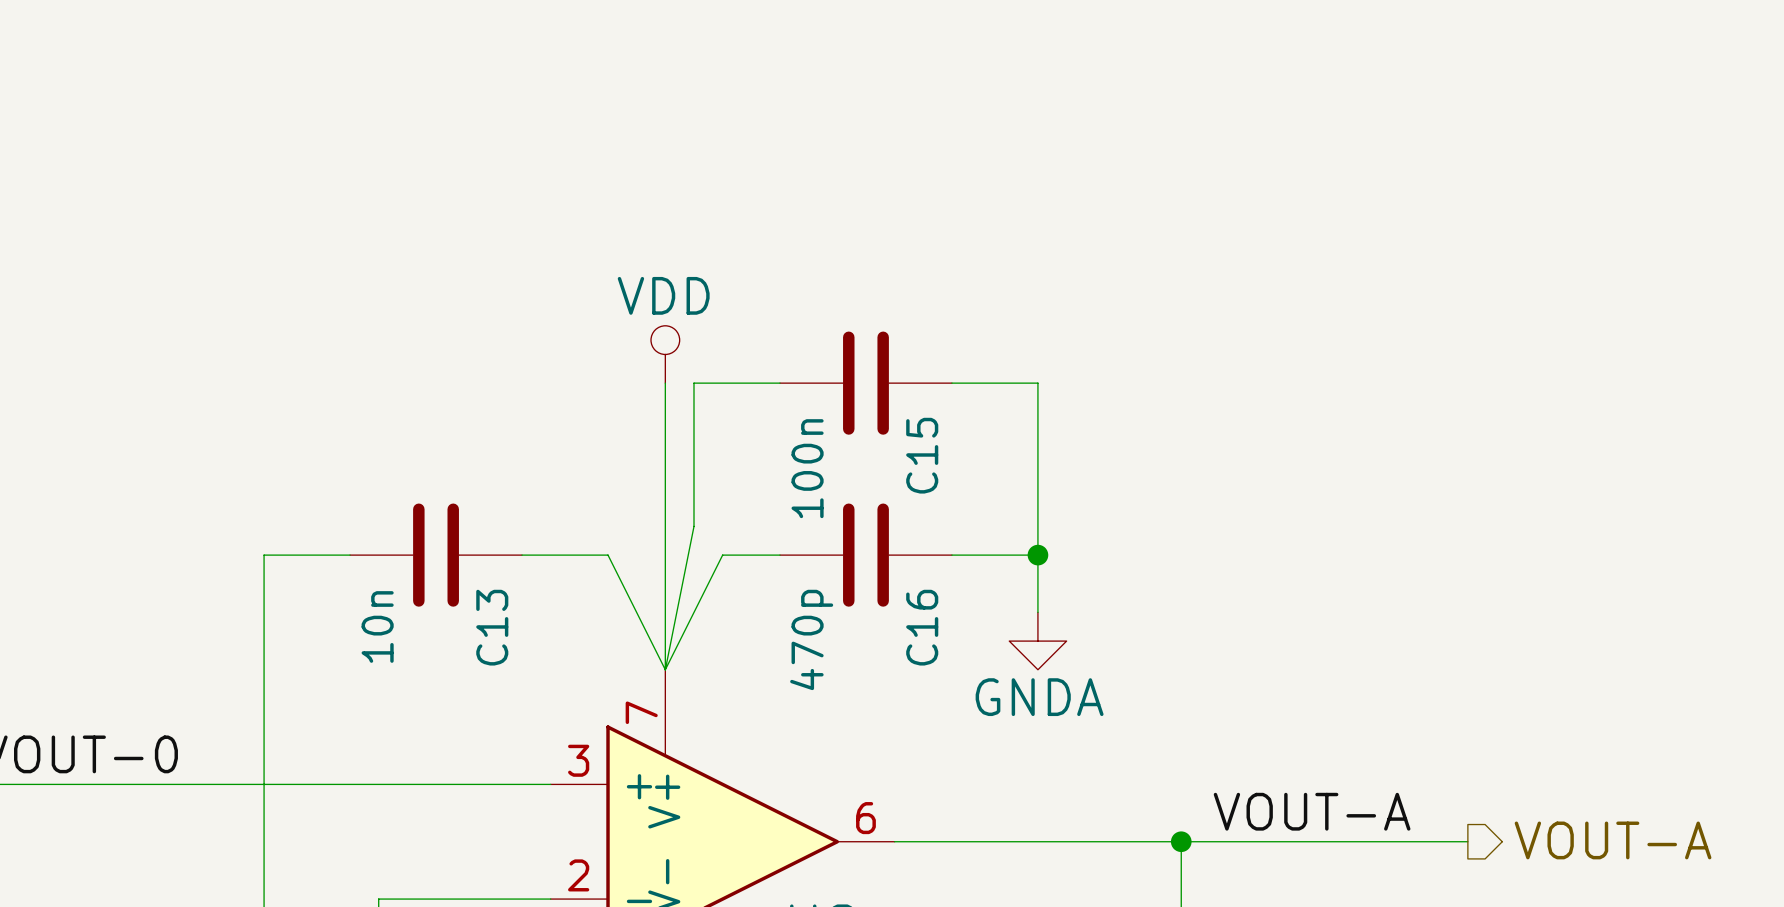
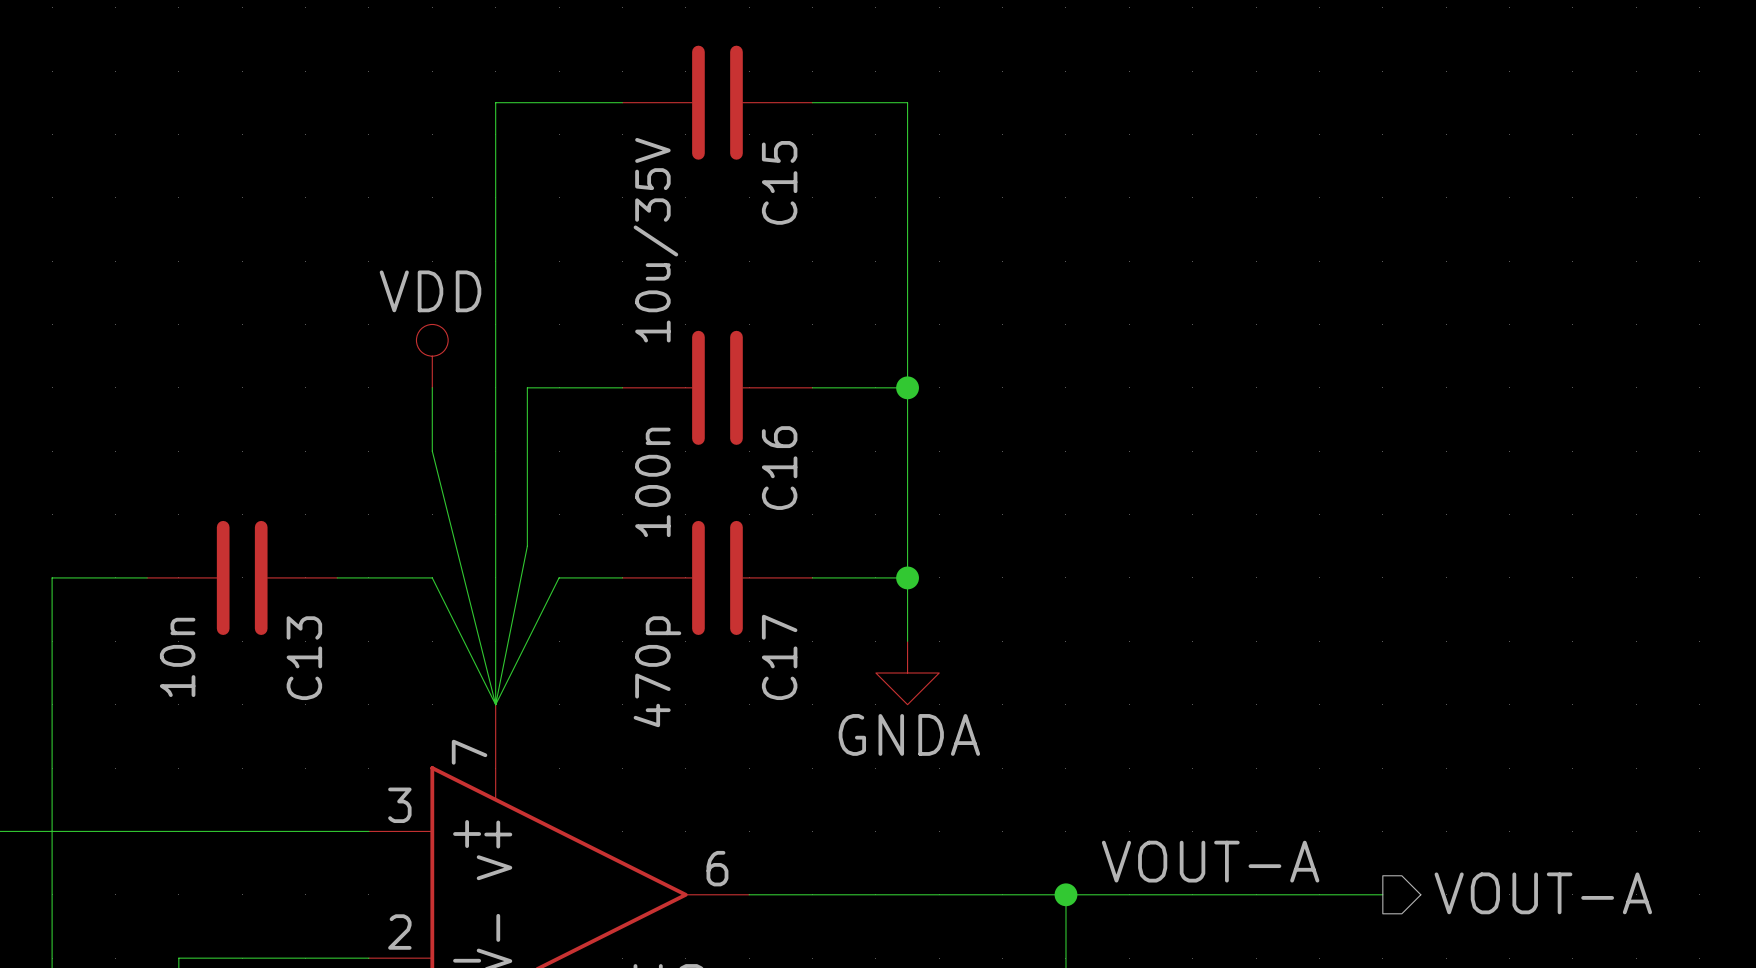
wire: none -> (622, 102) (495, 102) (495, 387)
C15: none -> 10u/35V (717, 102)
wire: none -> (812, 102) (907, 102) (907, 387)
power symbol position: VDD (665, 354) -> VDD (432, 356)
wire: none -> (432, 387) (432, 451) (495, 704)
junction: none -> (907, 387)
C15 name: C15 (922, 455) -> C16 (779, 468)
C16 name: C16 (922, 627) -> C17 (779, 657)

